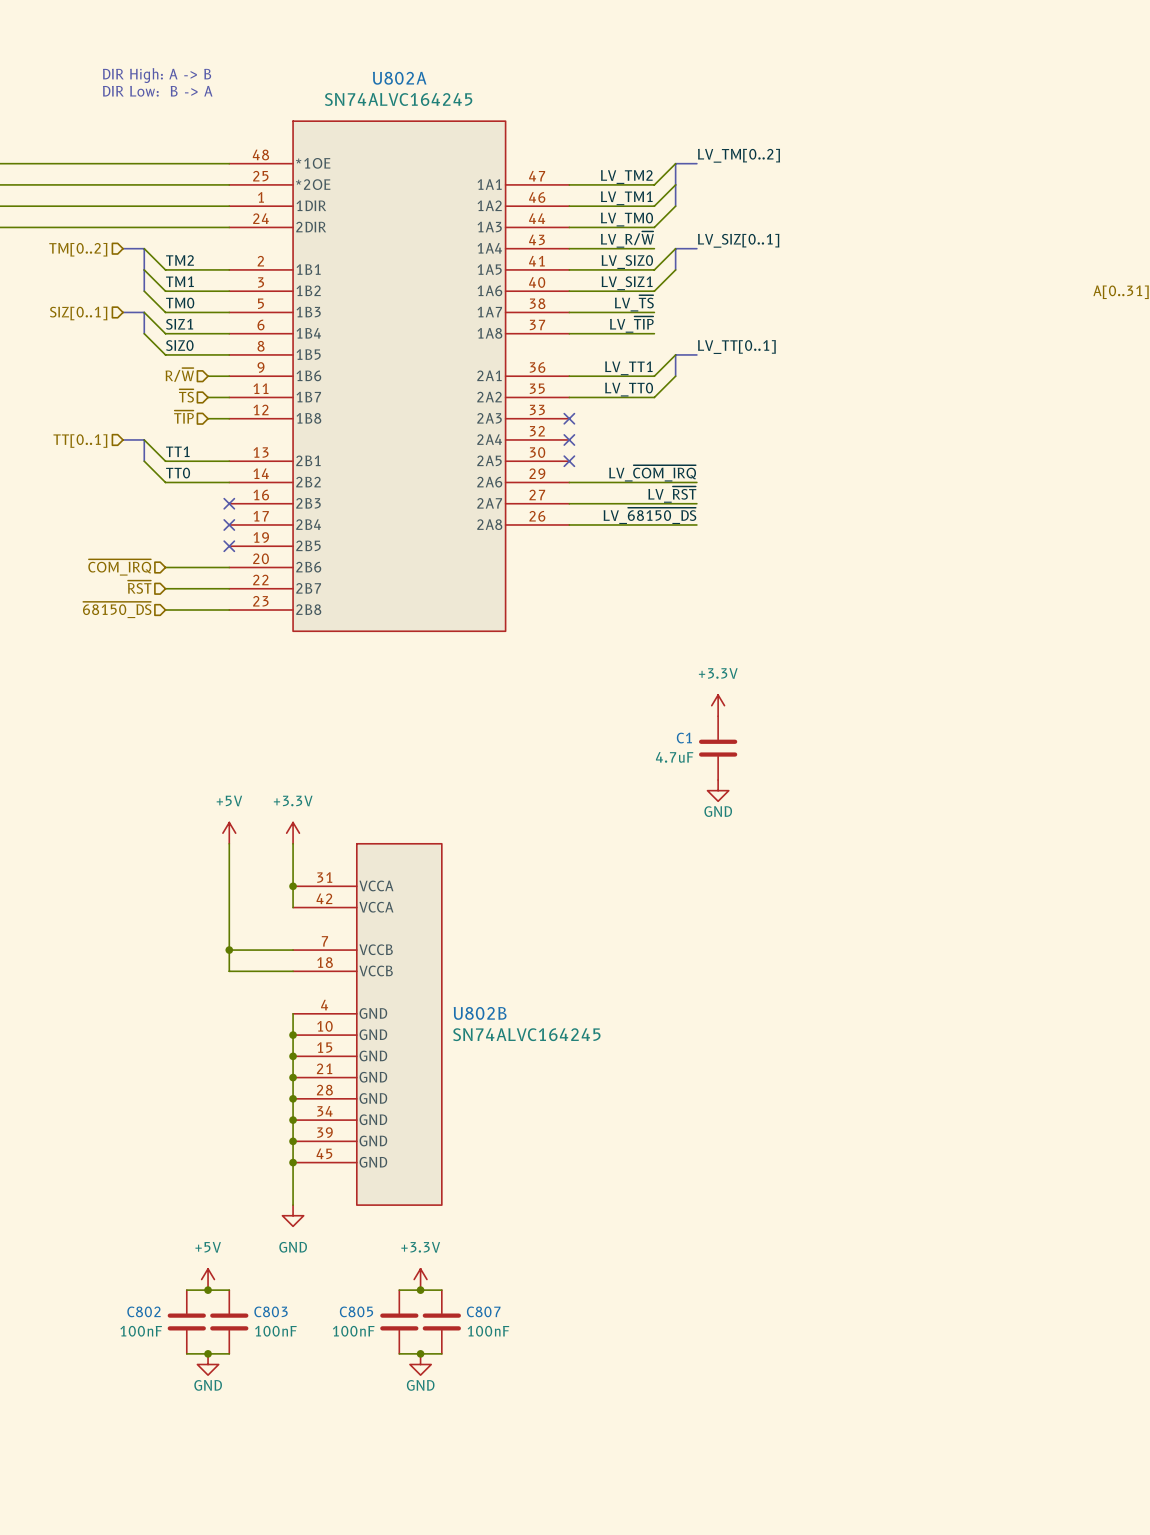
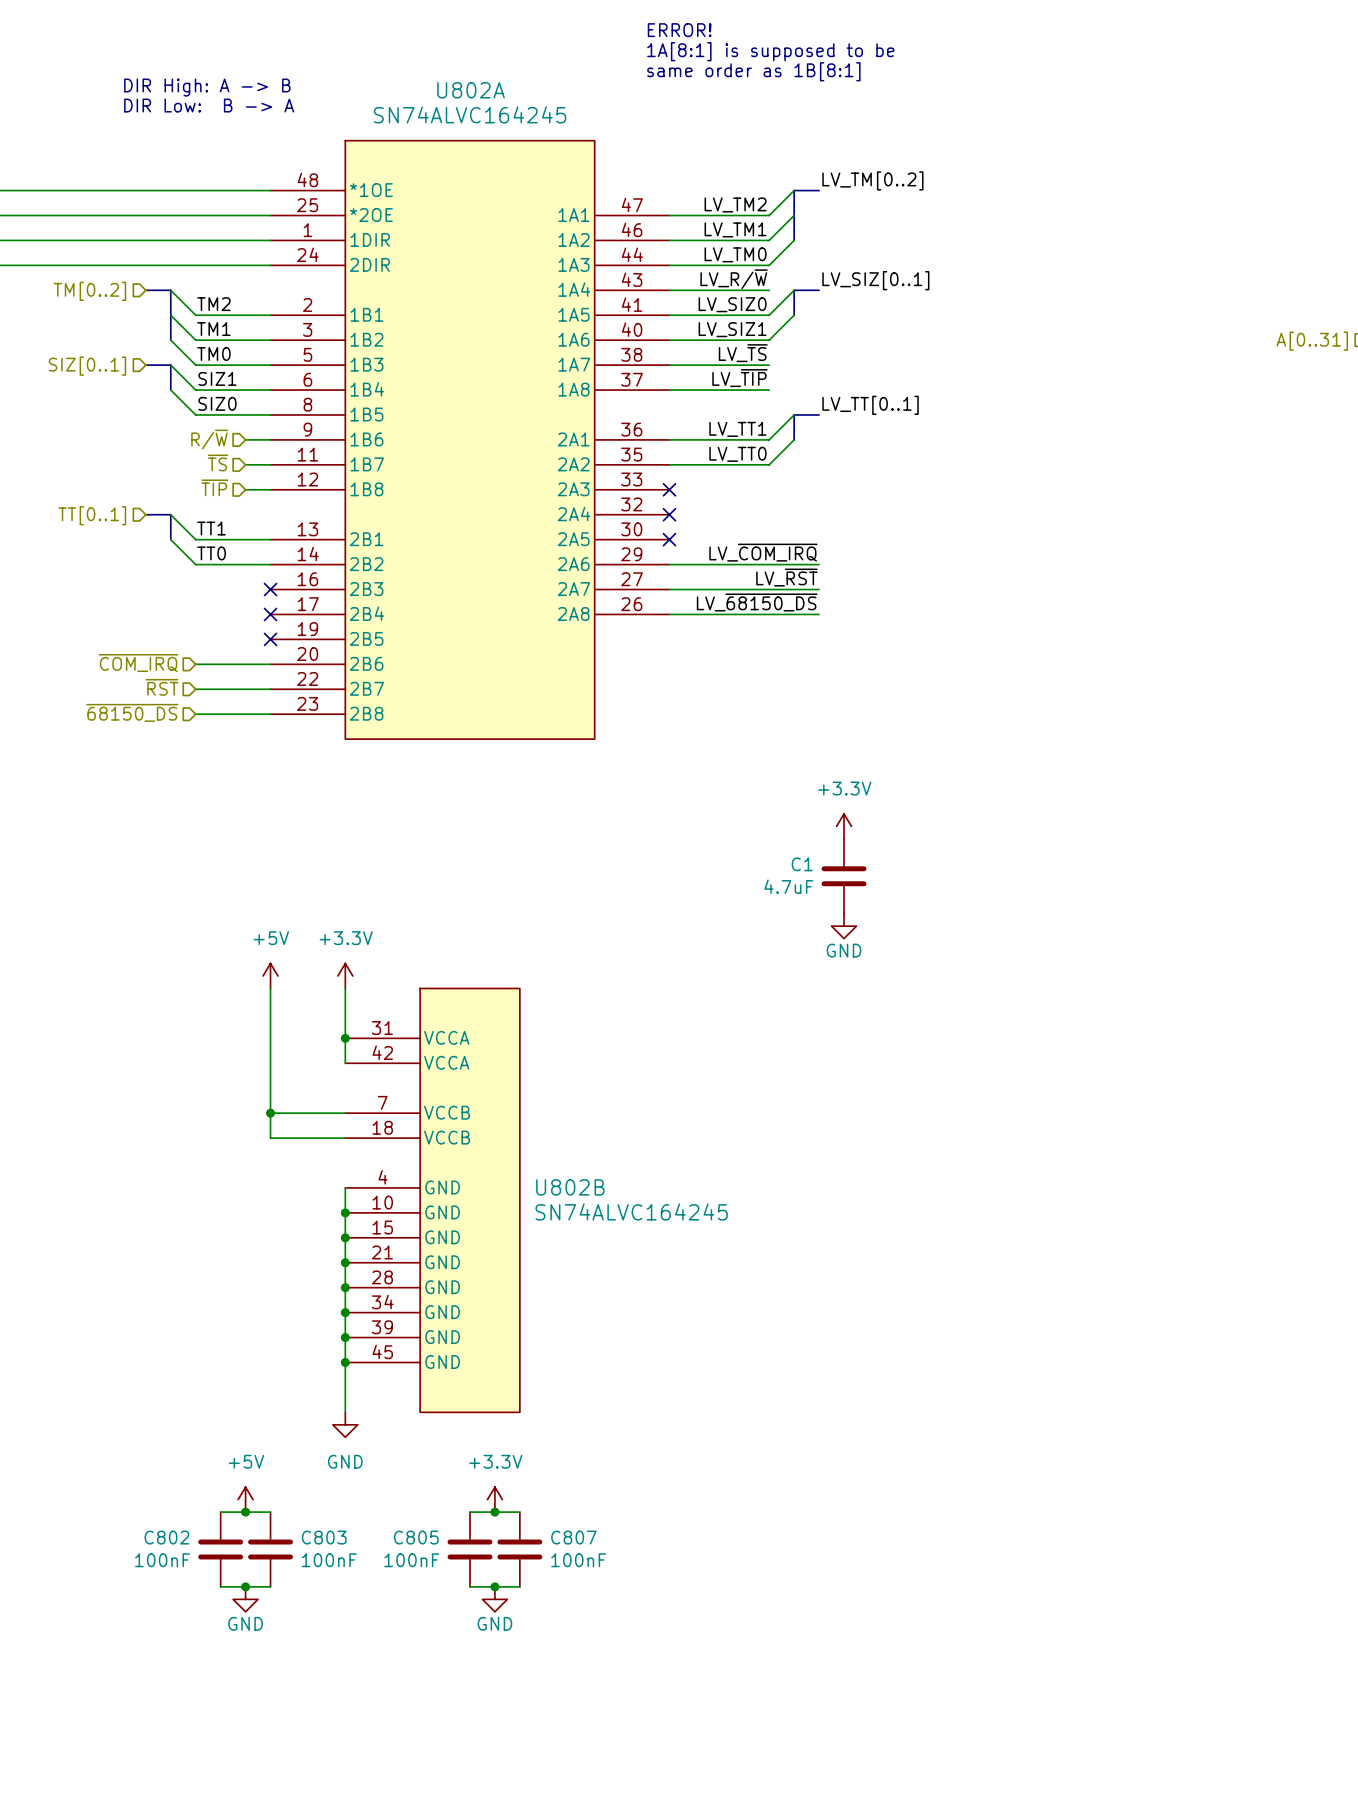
text: none -> ERROR! (679, 30)
text: none -> 1A[8:1] is supposed to be (770, 51)
text: none -> same order as 1B[8:1] (753, 71)

